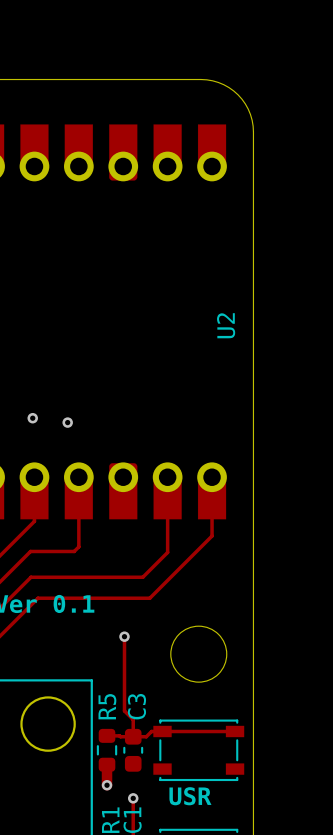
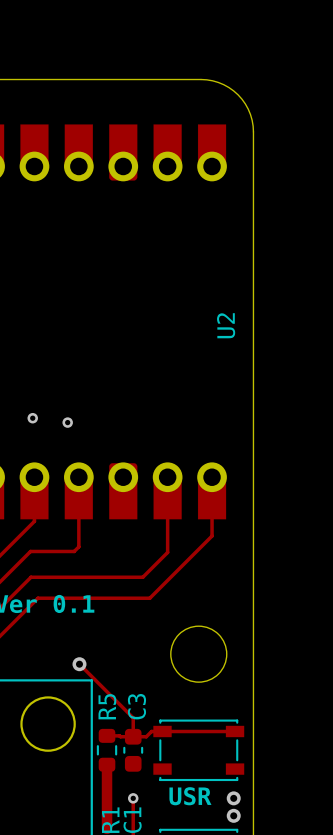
track: (124, 636) (124, 710) (133, 719) -> (79, 664) (133, 719)
via: (124, 636) -> none
via: none -> (79, 664)
track: none -> (107, 785) (107, 828)
via: (107, 785) -> none
via: none -> (233, 798)
via: none -> (233, 815)

